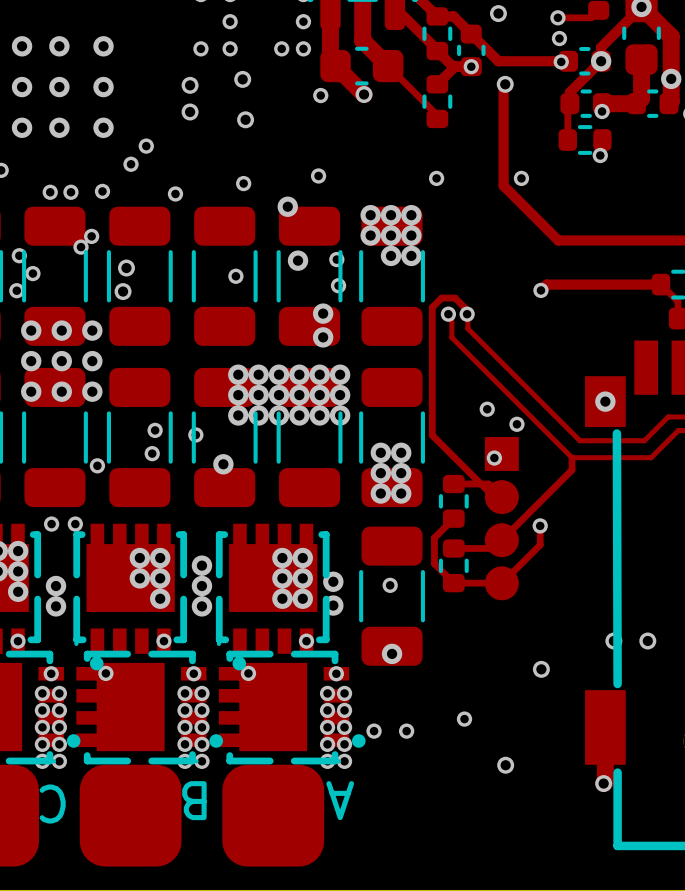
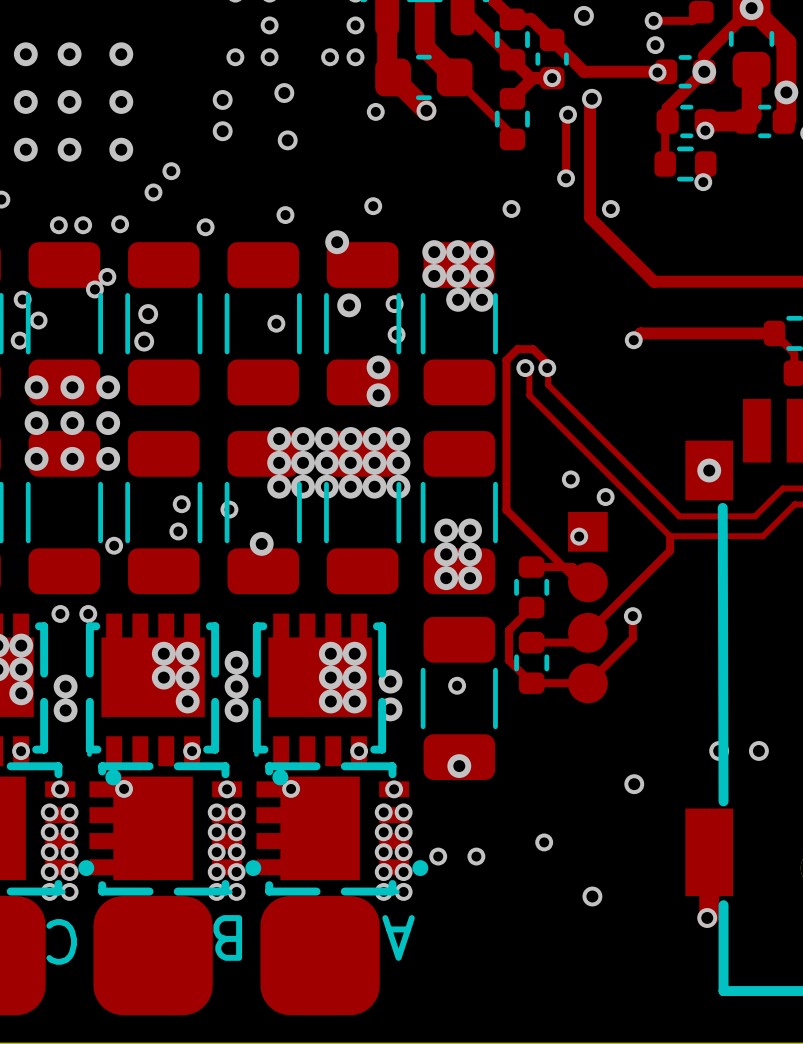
track: none -> (568, 114) (566, 116) (566, 178)
via: none -> (568, 114)
via: none -> (566, 178)

